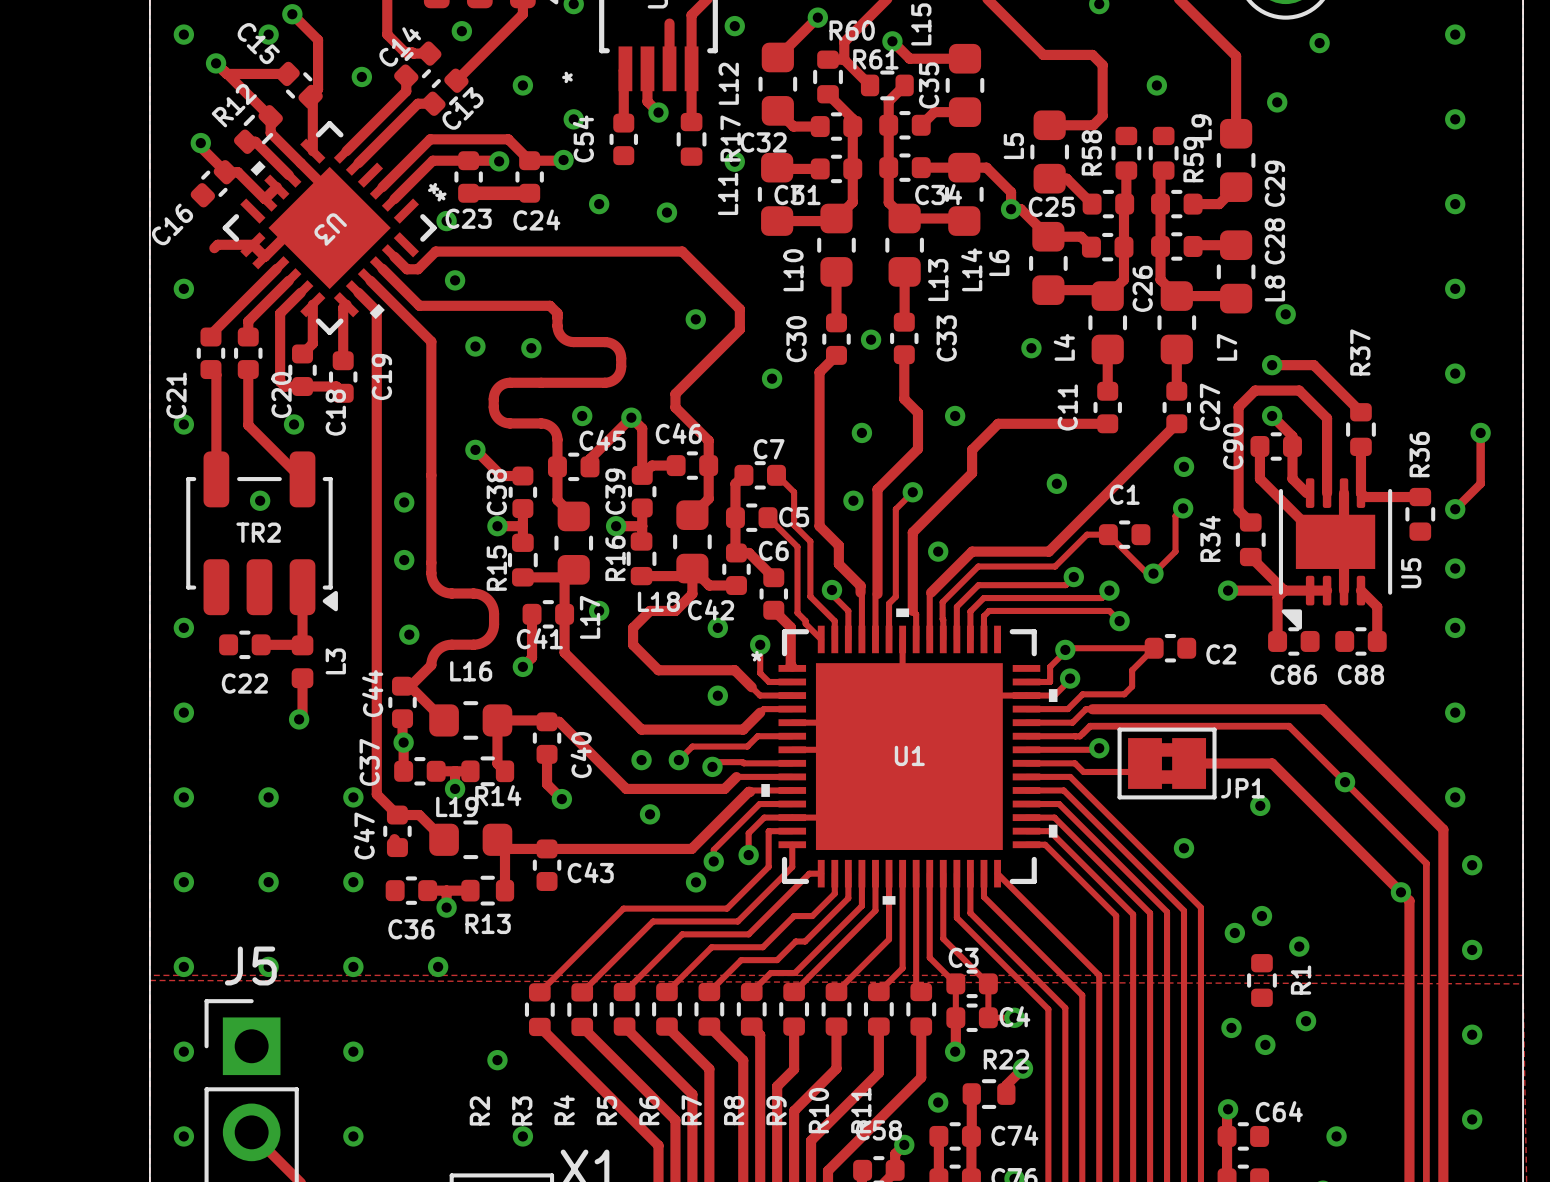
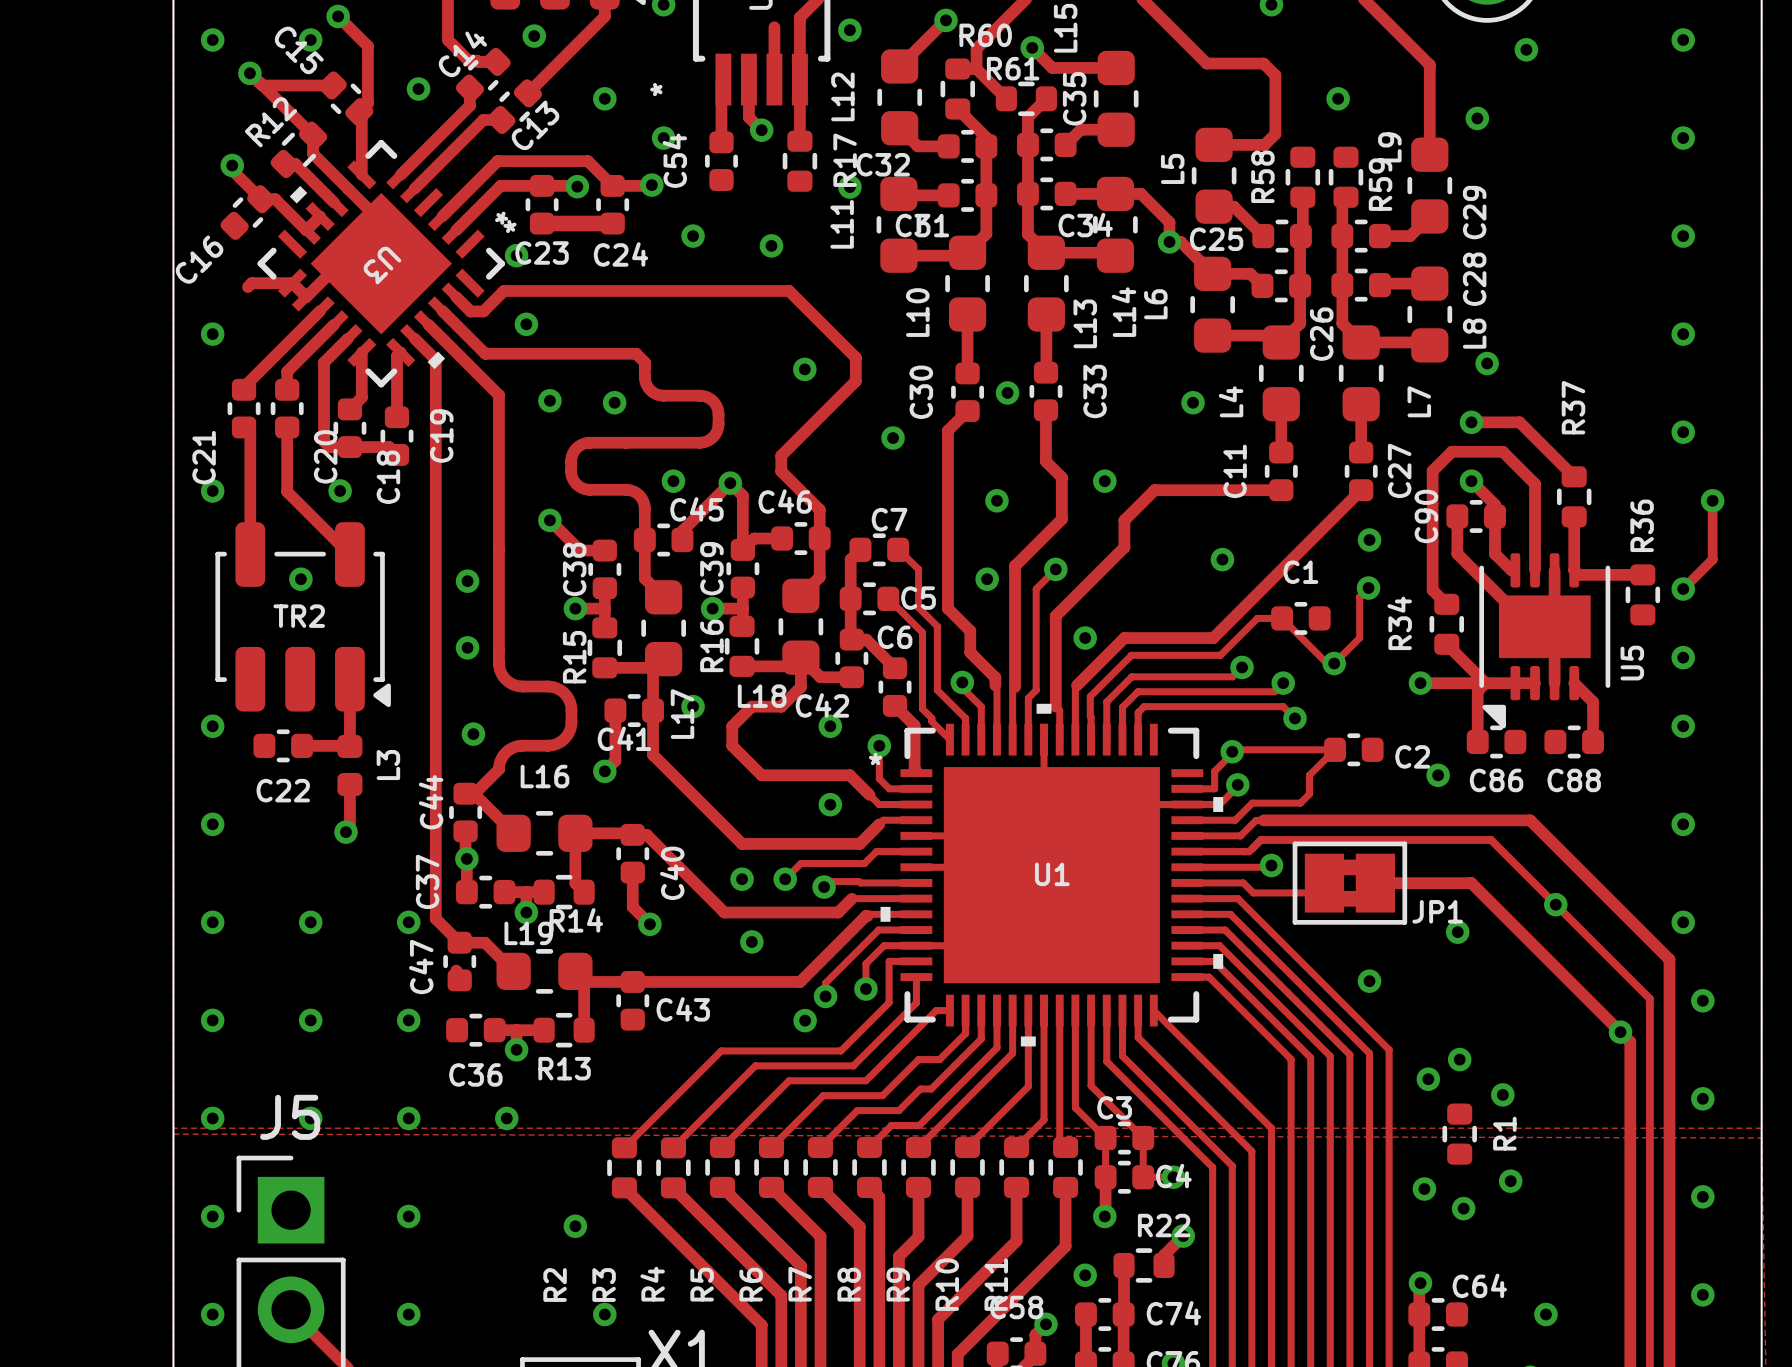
via: none -> (1438, 775)

